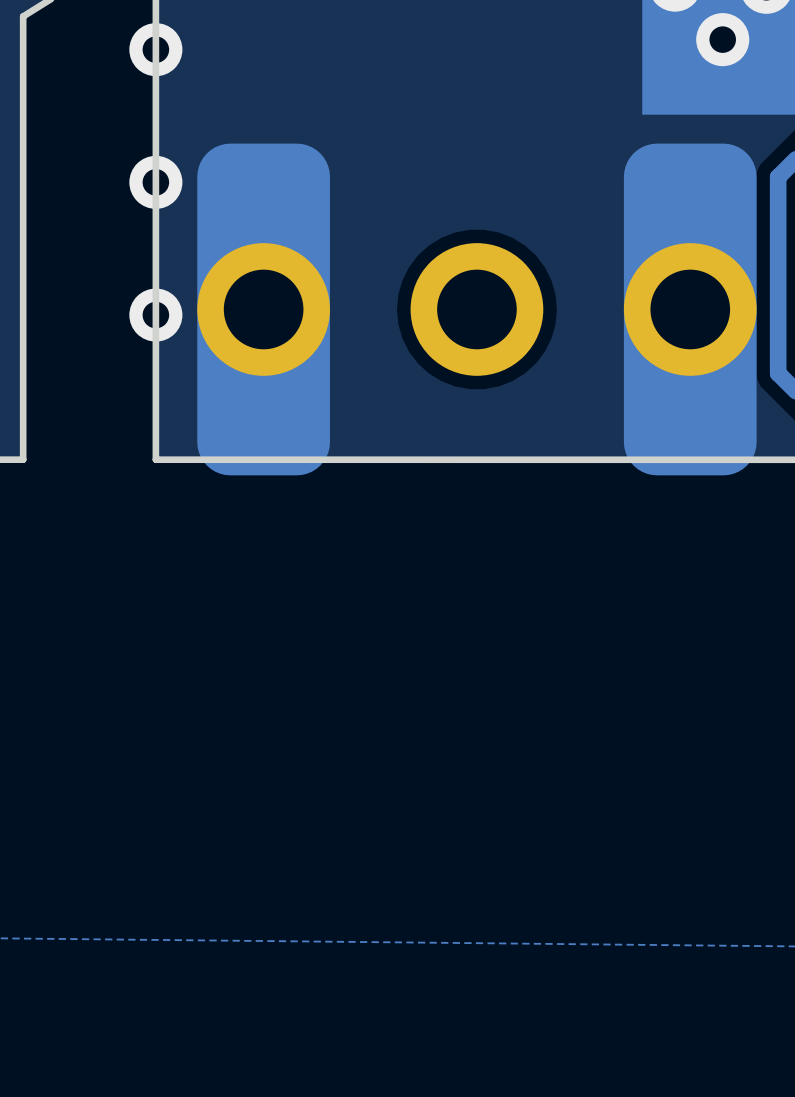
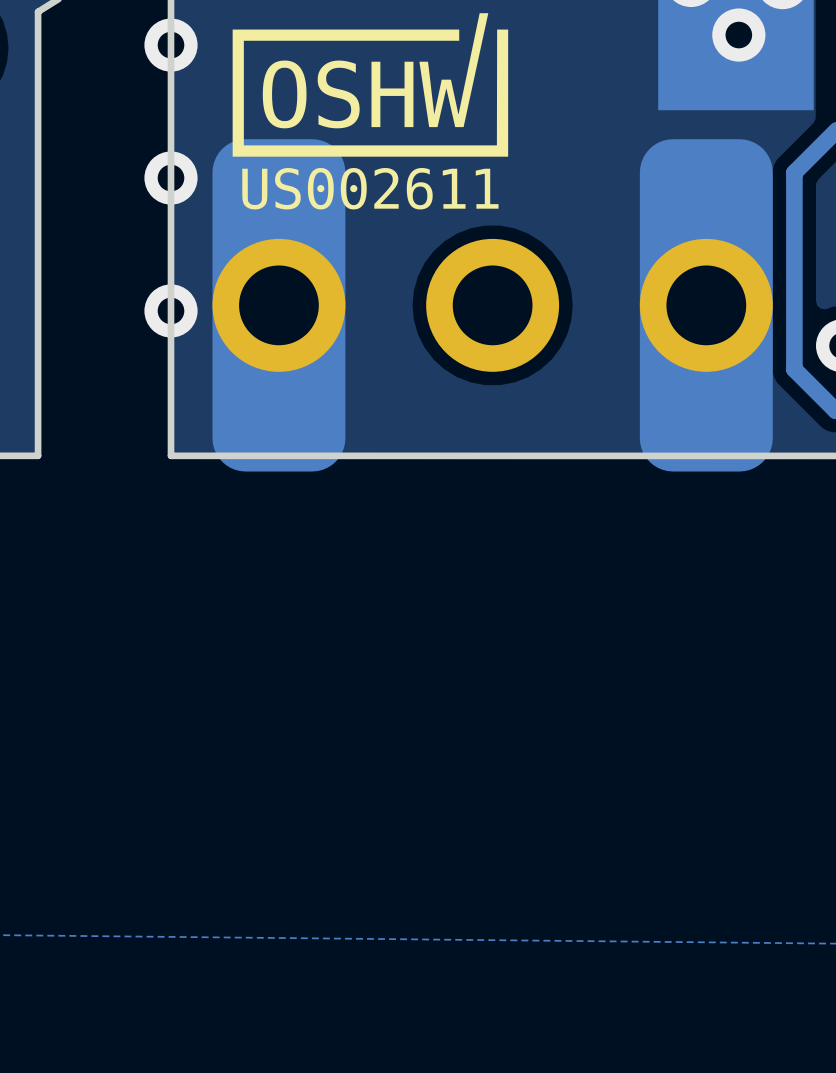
drawing: none -> [232, 13, 509, 210]

